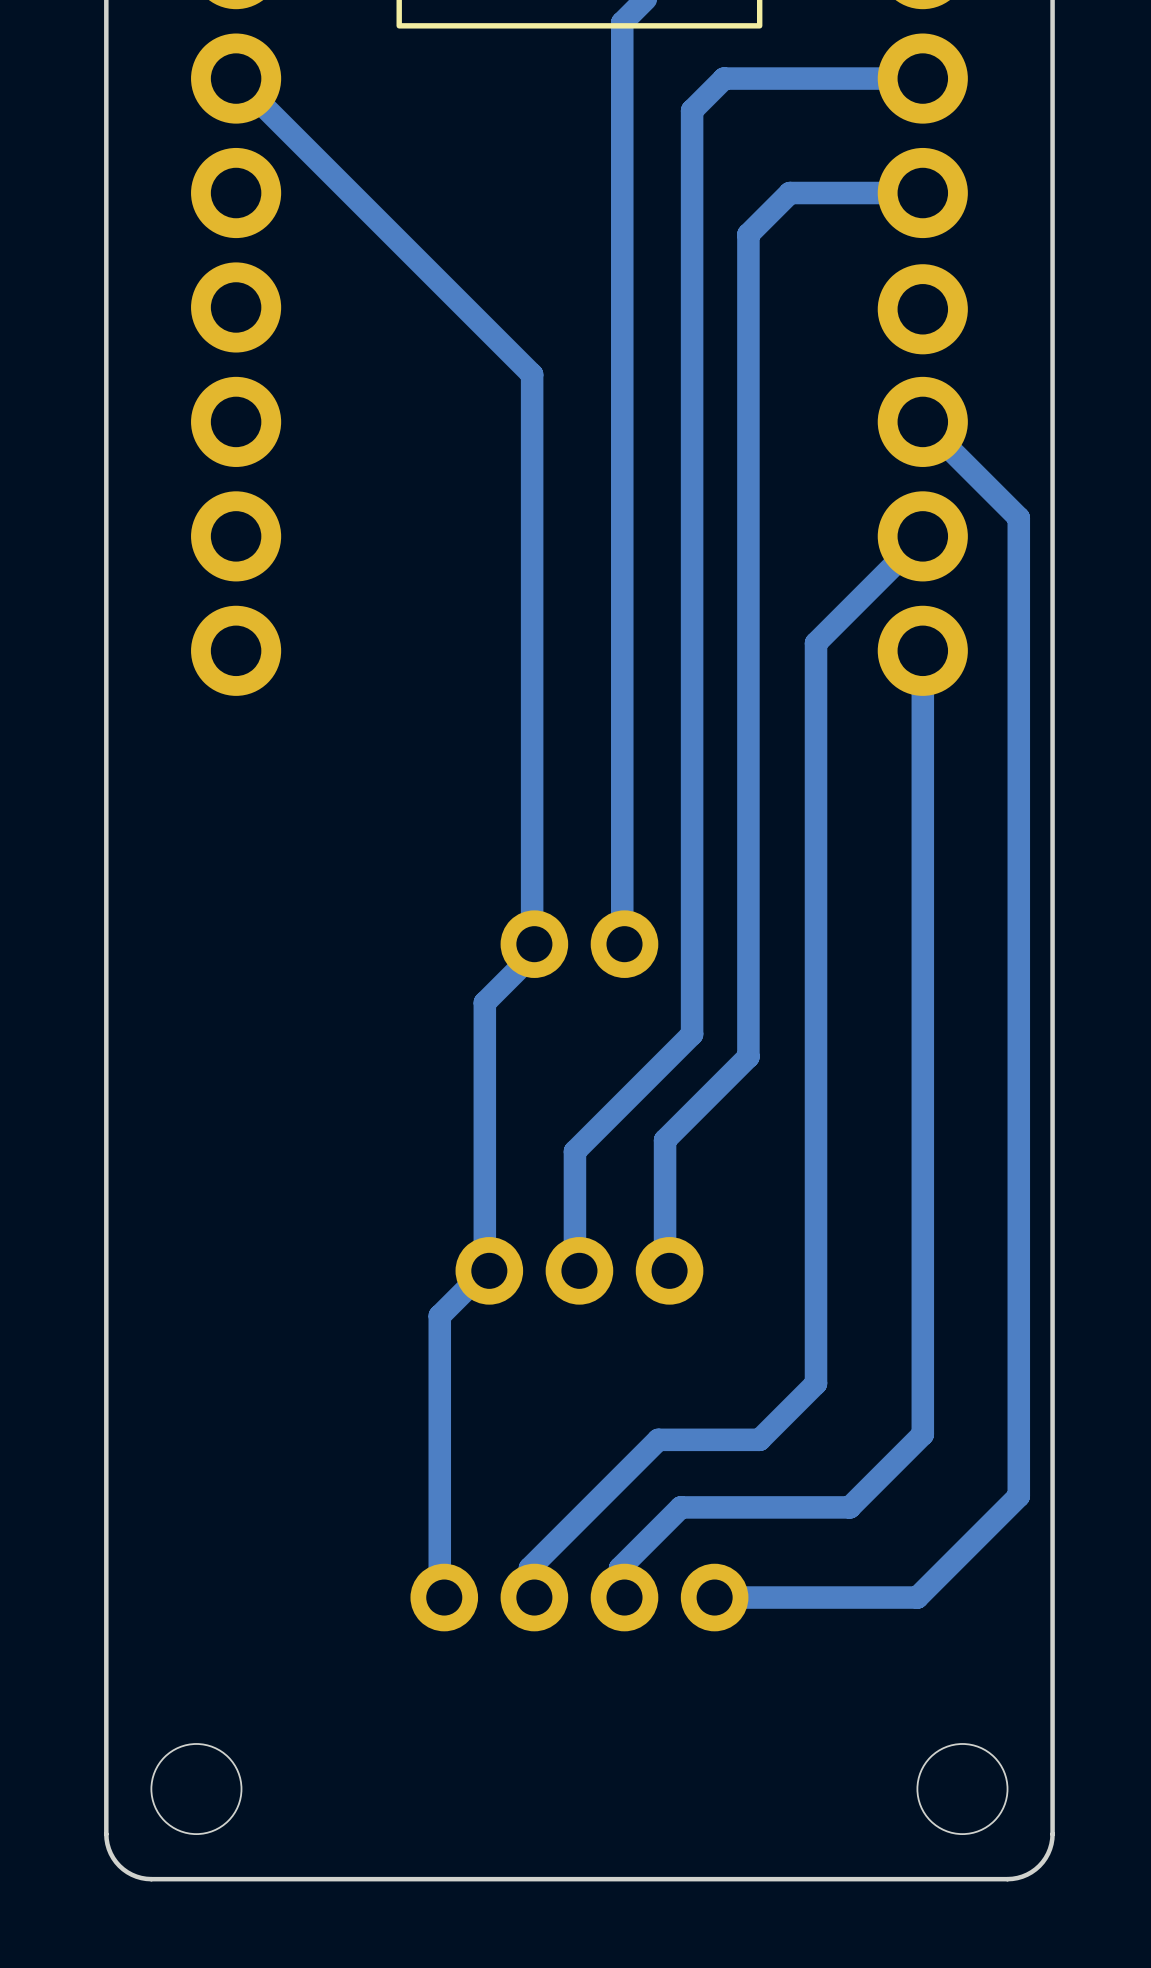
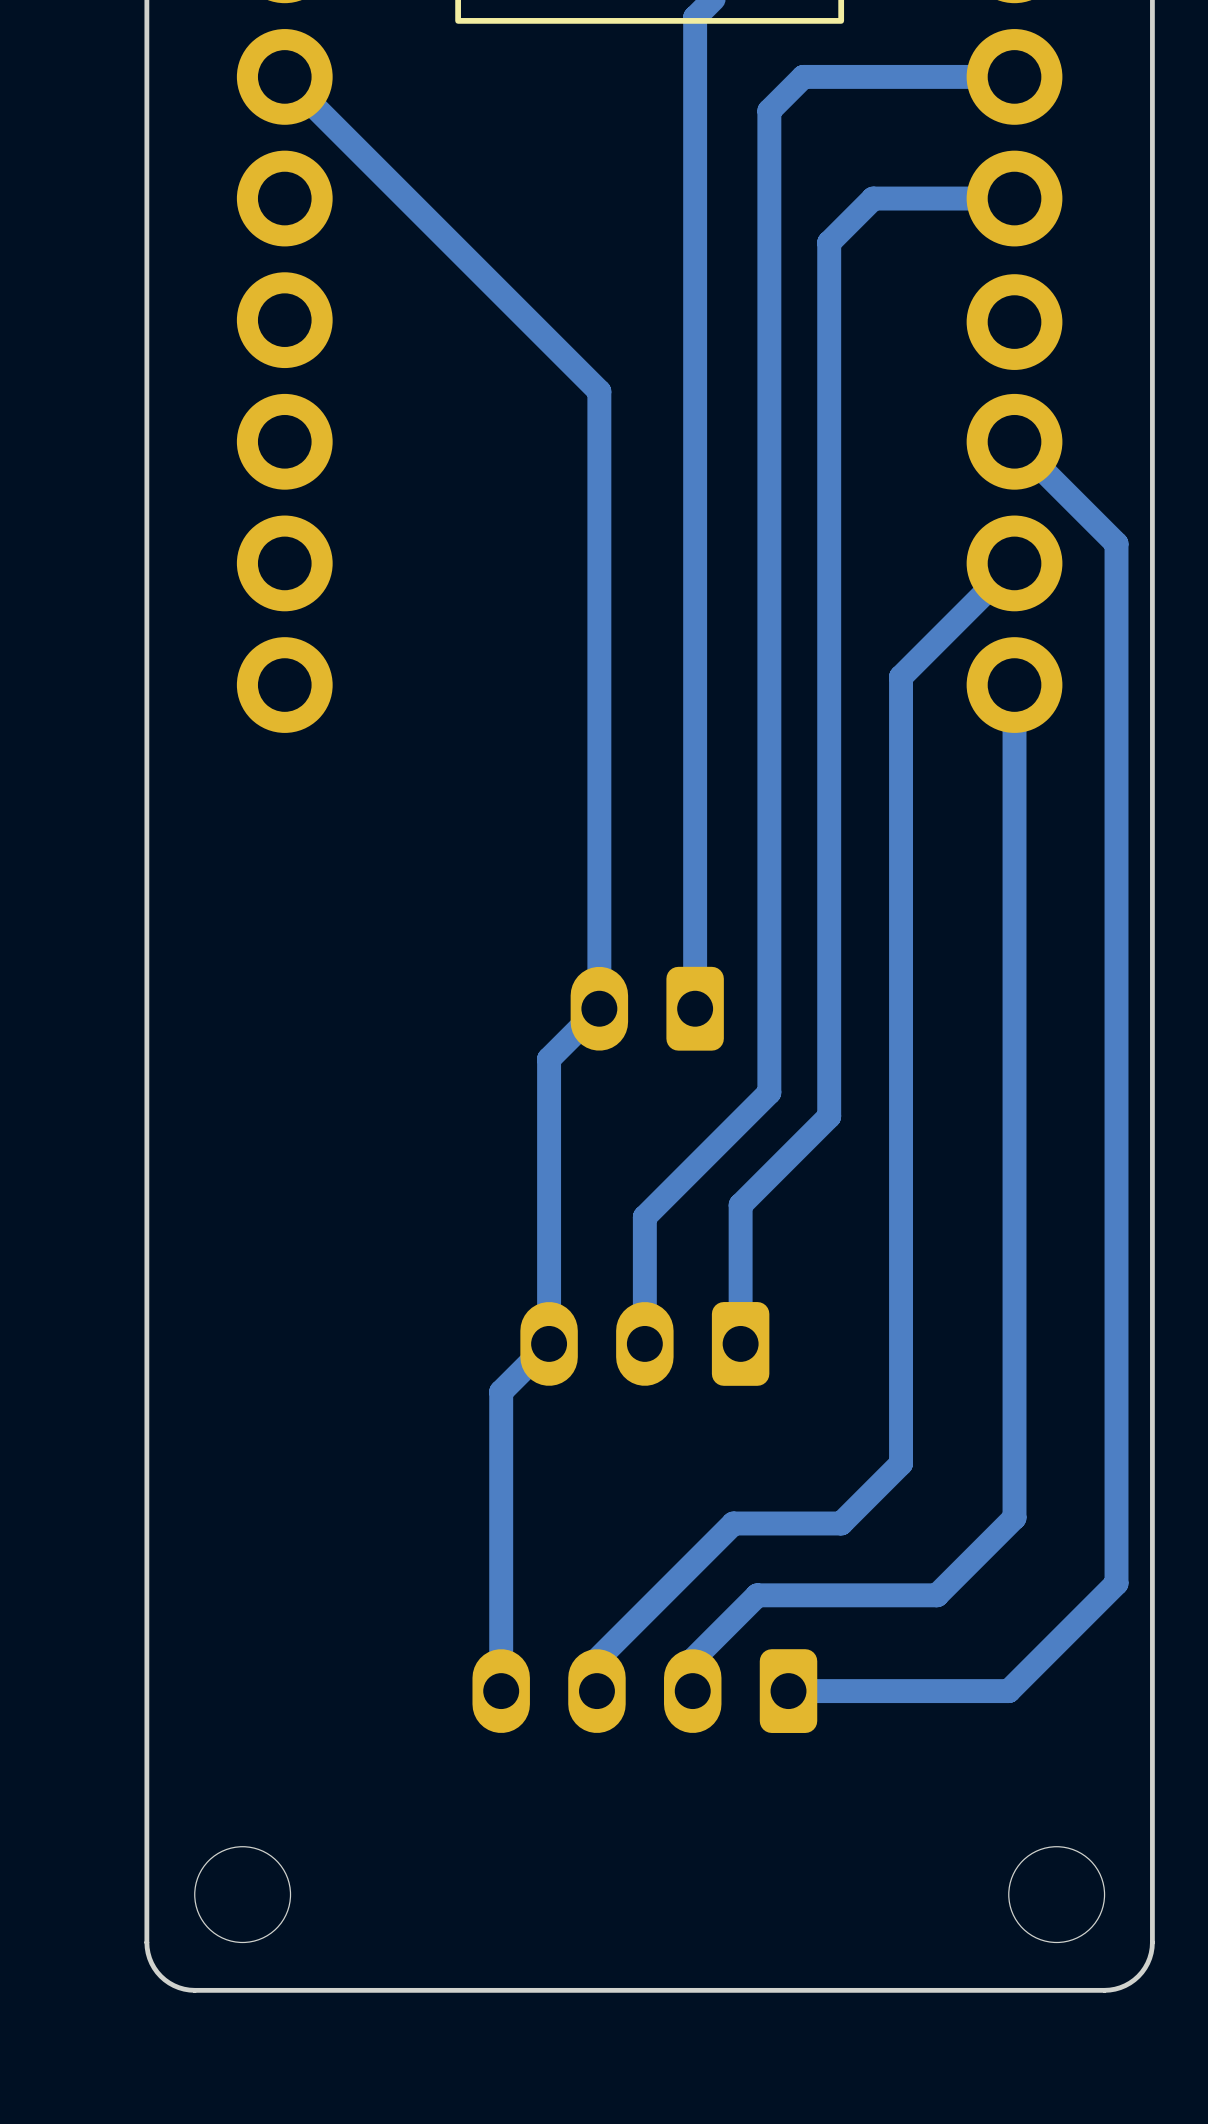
part footprint: [500, 910, 659, 978] -> [570, 966, 724, 1051]
part footprint: [455, 1237, 704, 1305] -> [520, 1302, 770, 1386]
part footprint: [410, 1563, 749, 1632] -> [472, 1649, 818, 1733]

